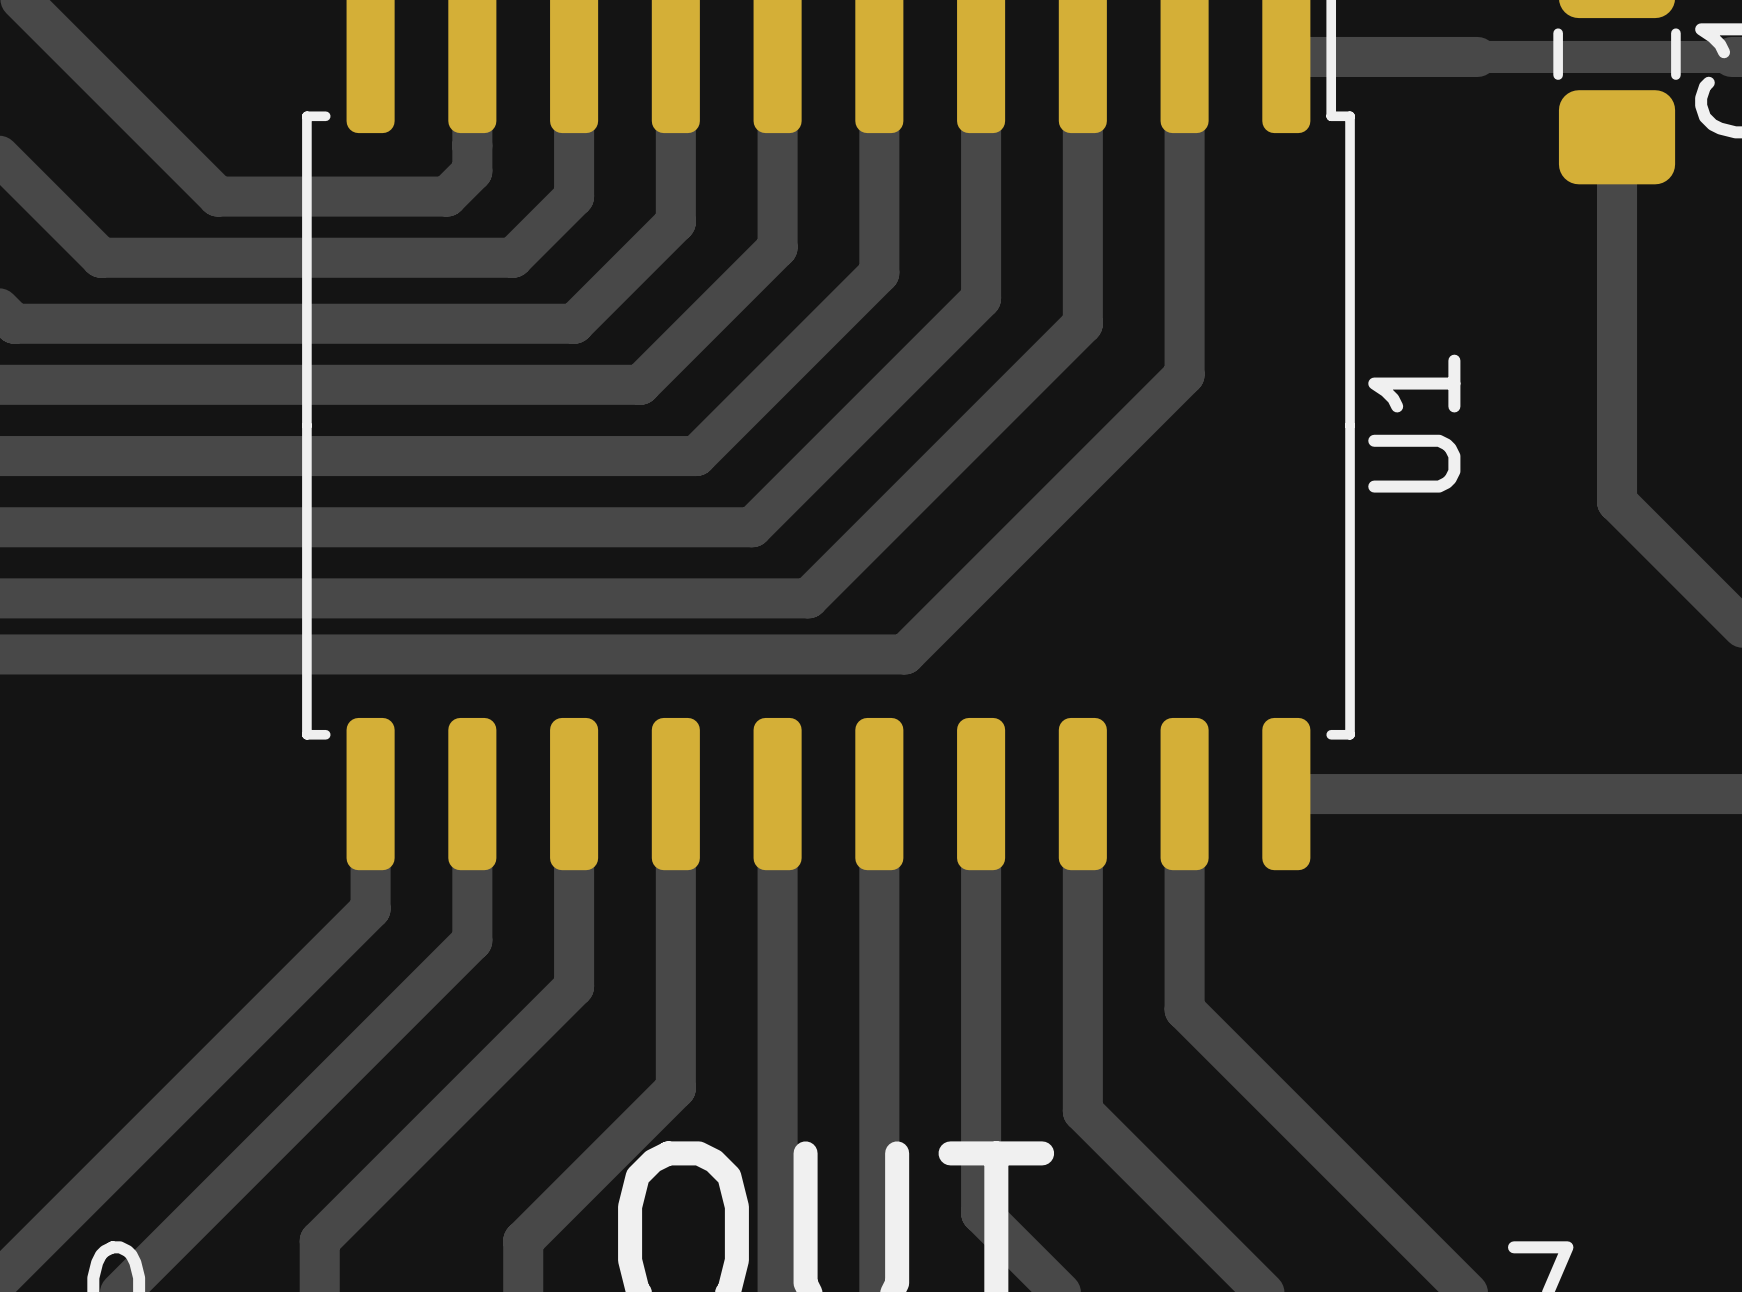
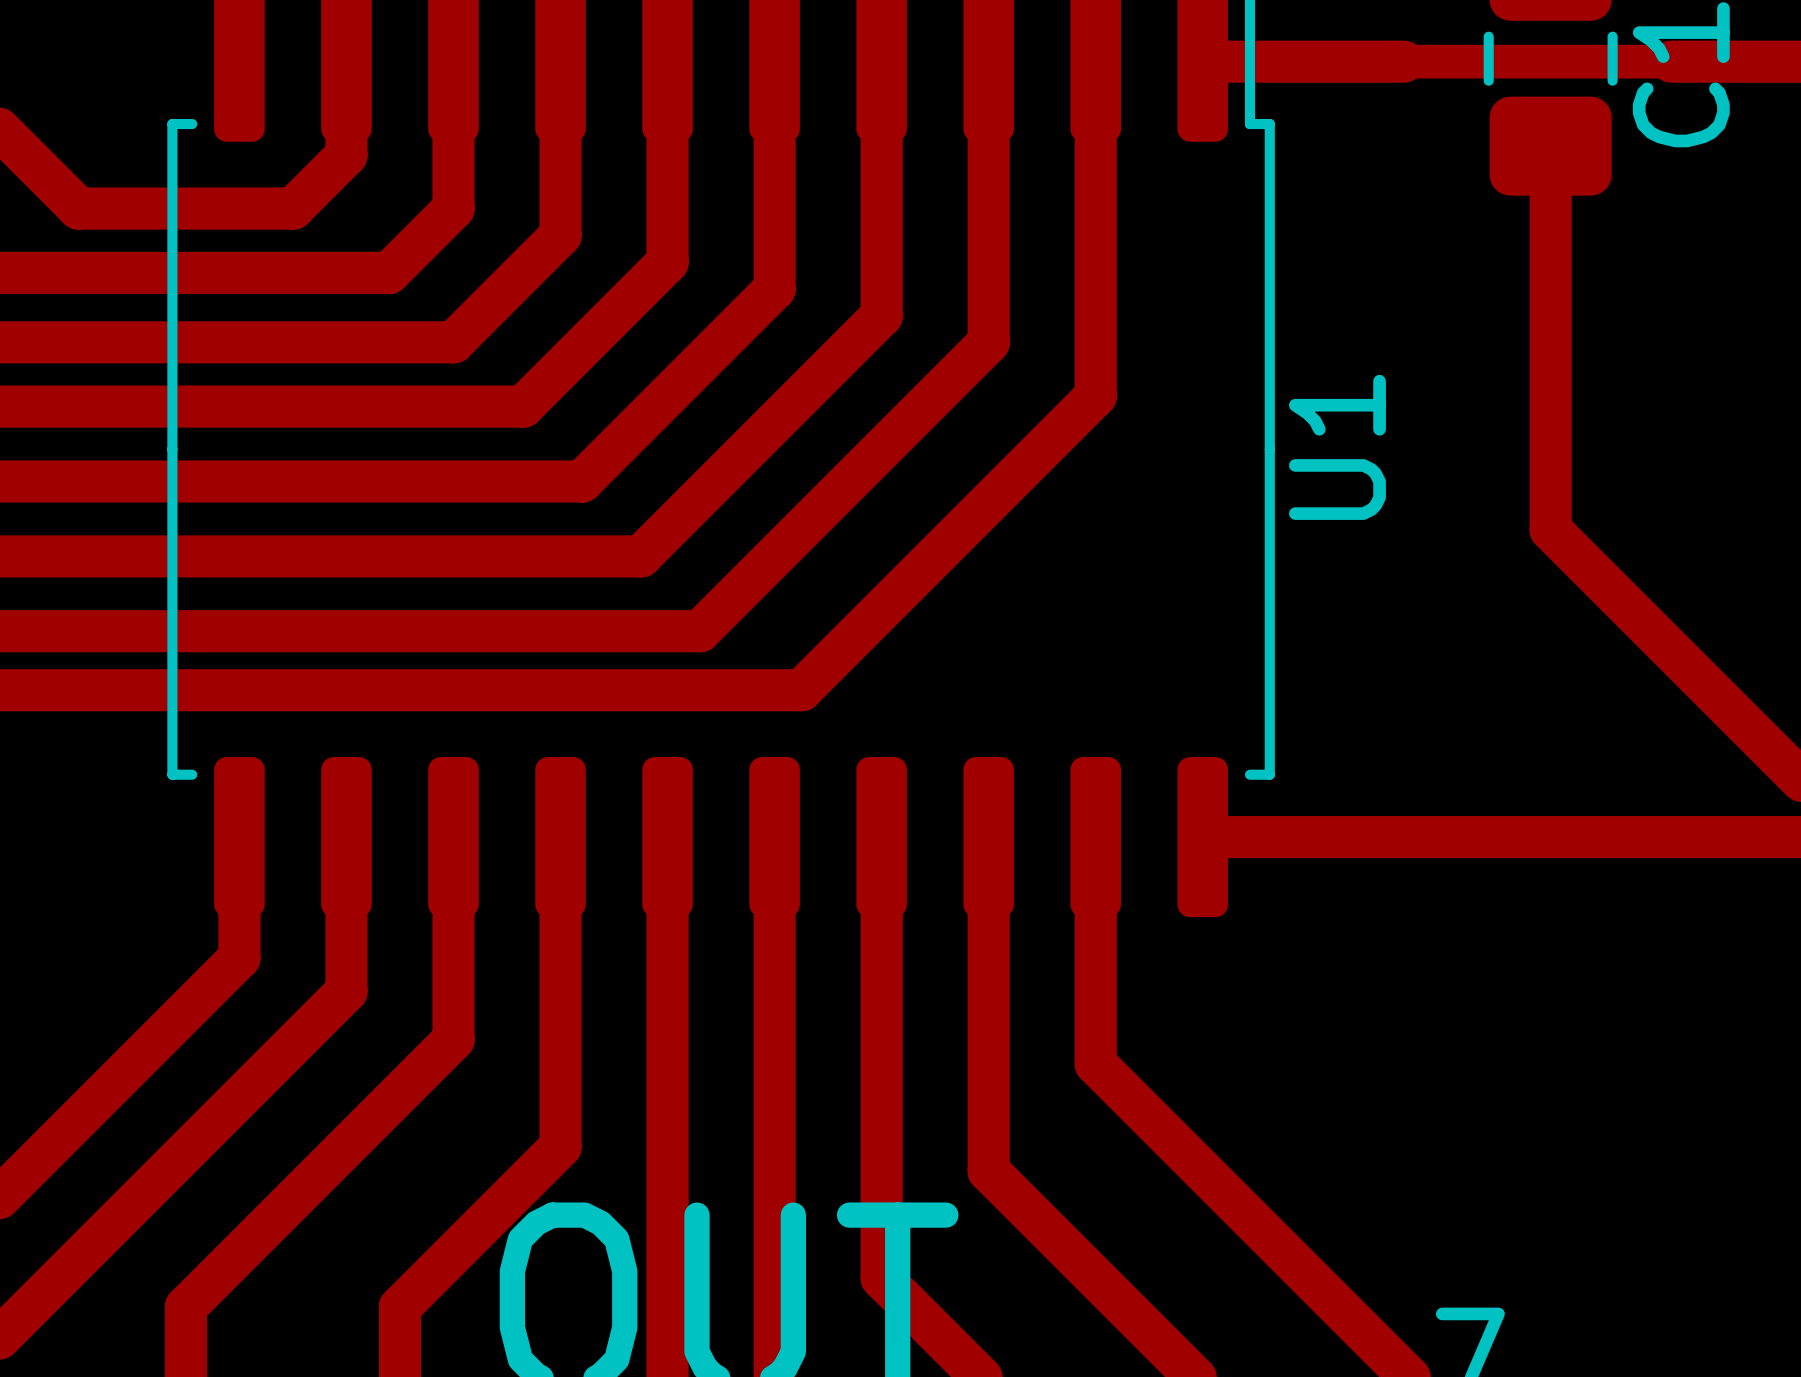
track: (472, 145) (472, 171) (446, 196) (421, 196) -> (346, 155) (292, 208)

